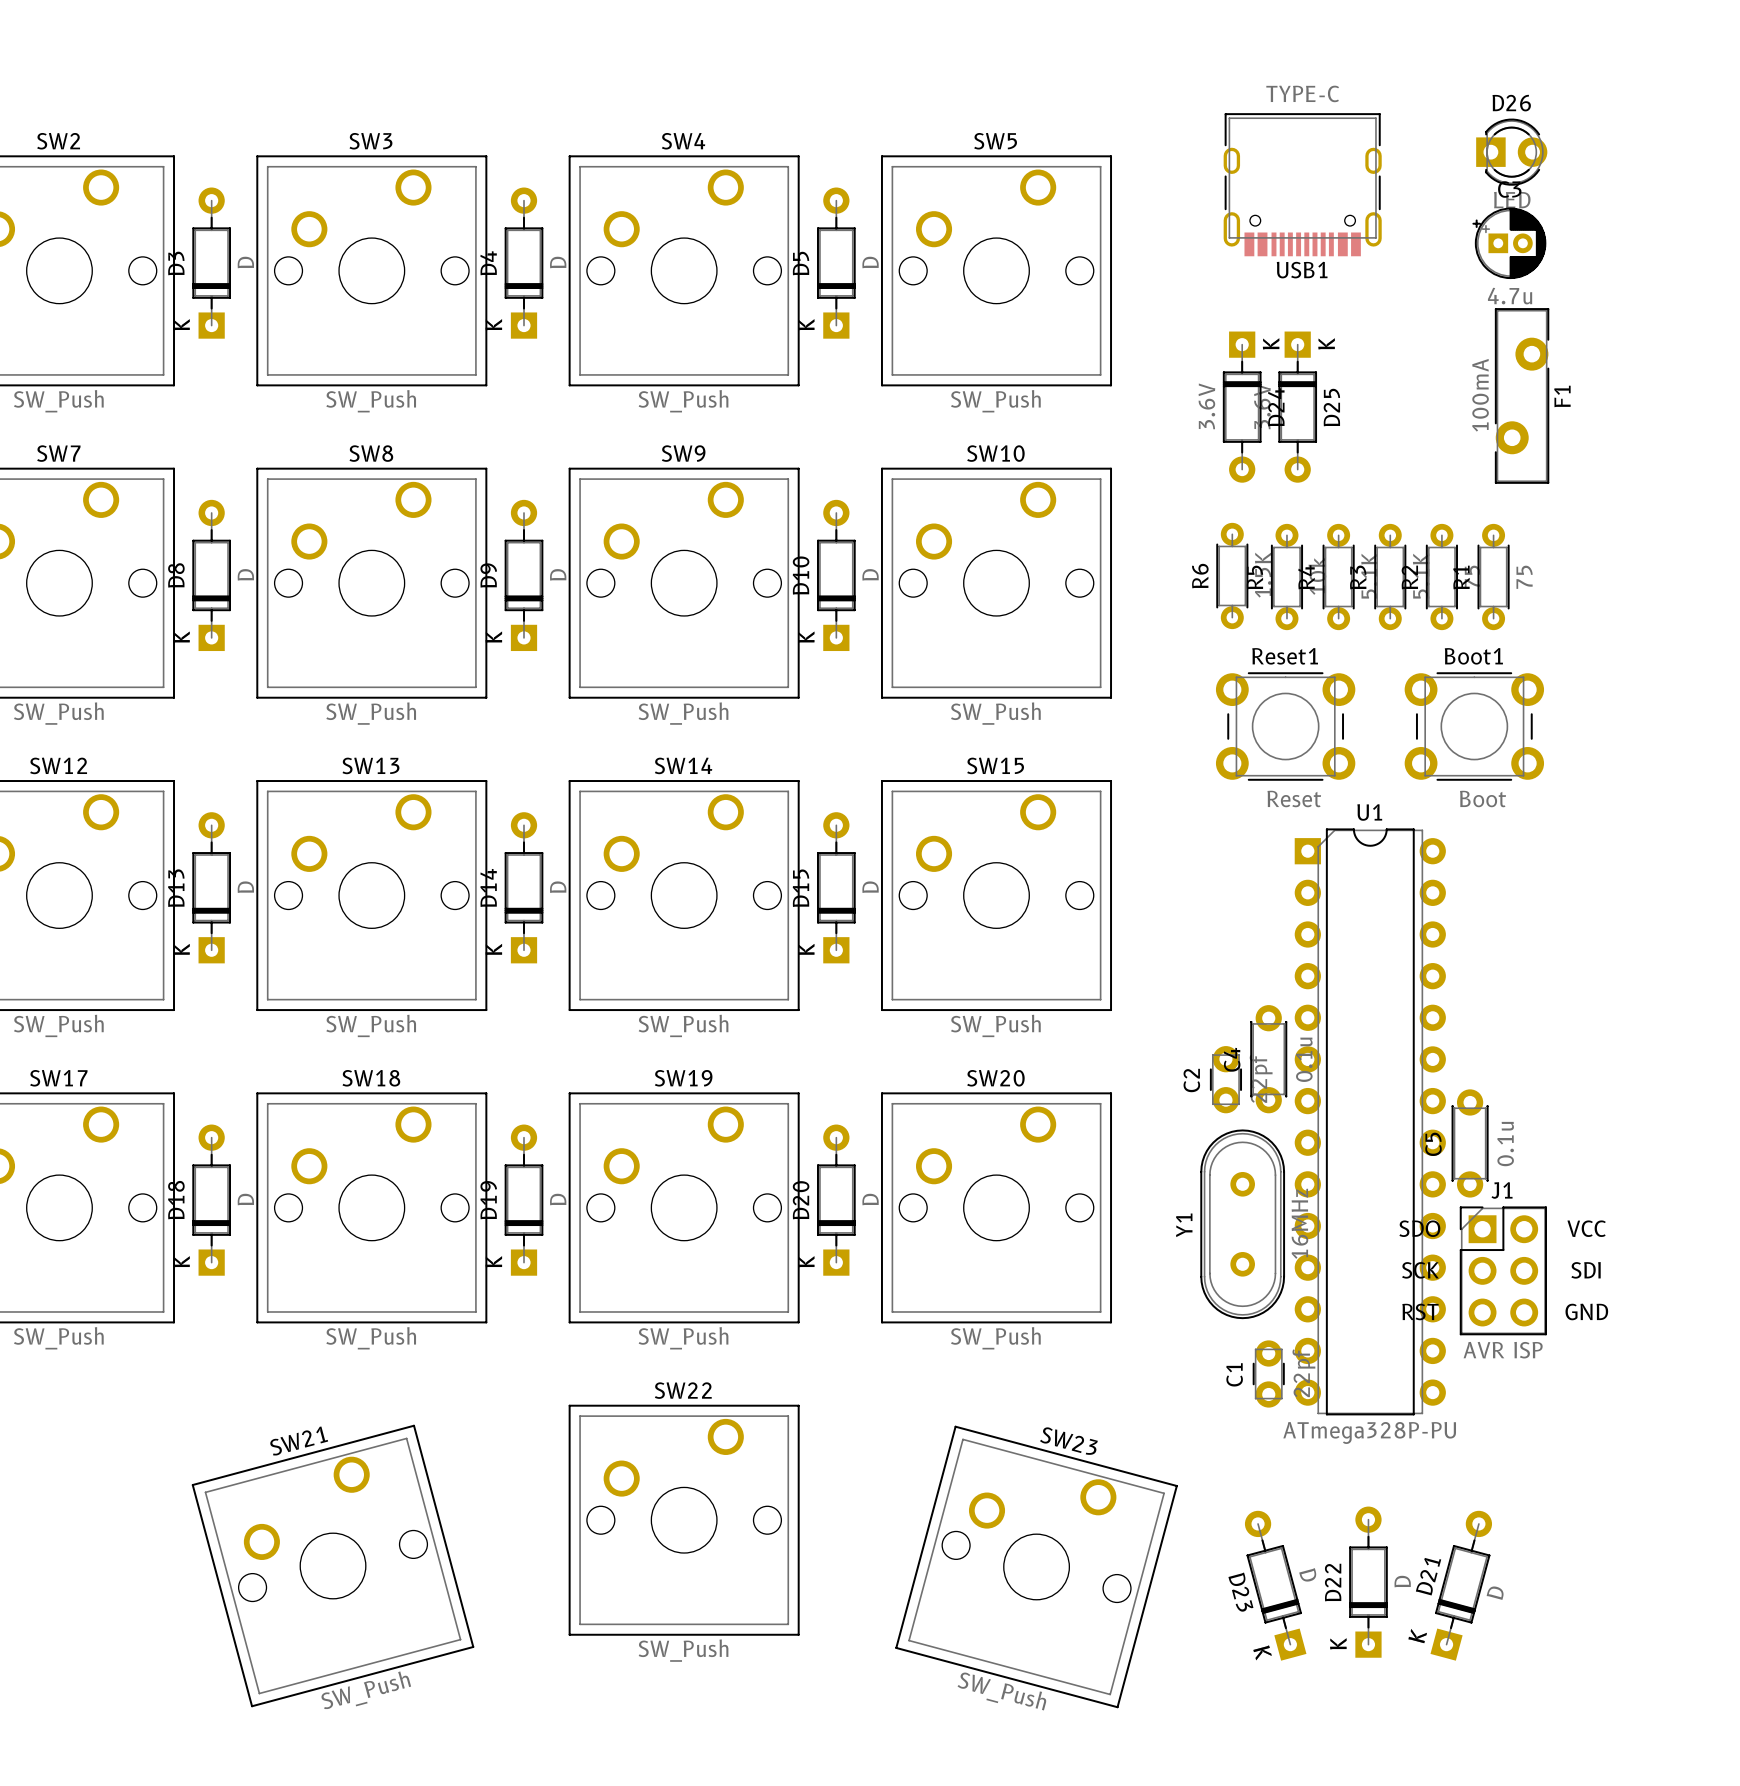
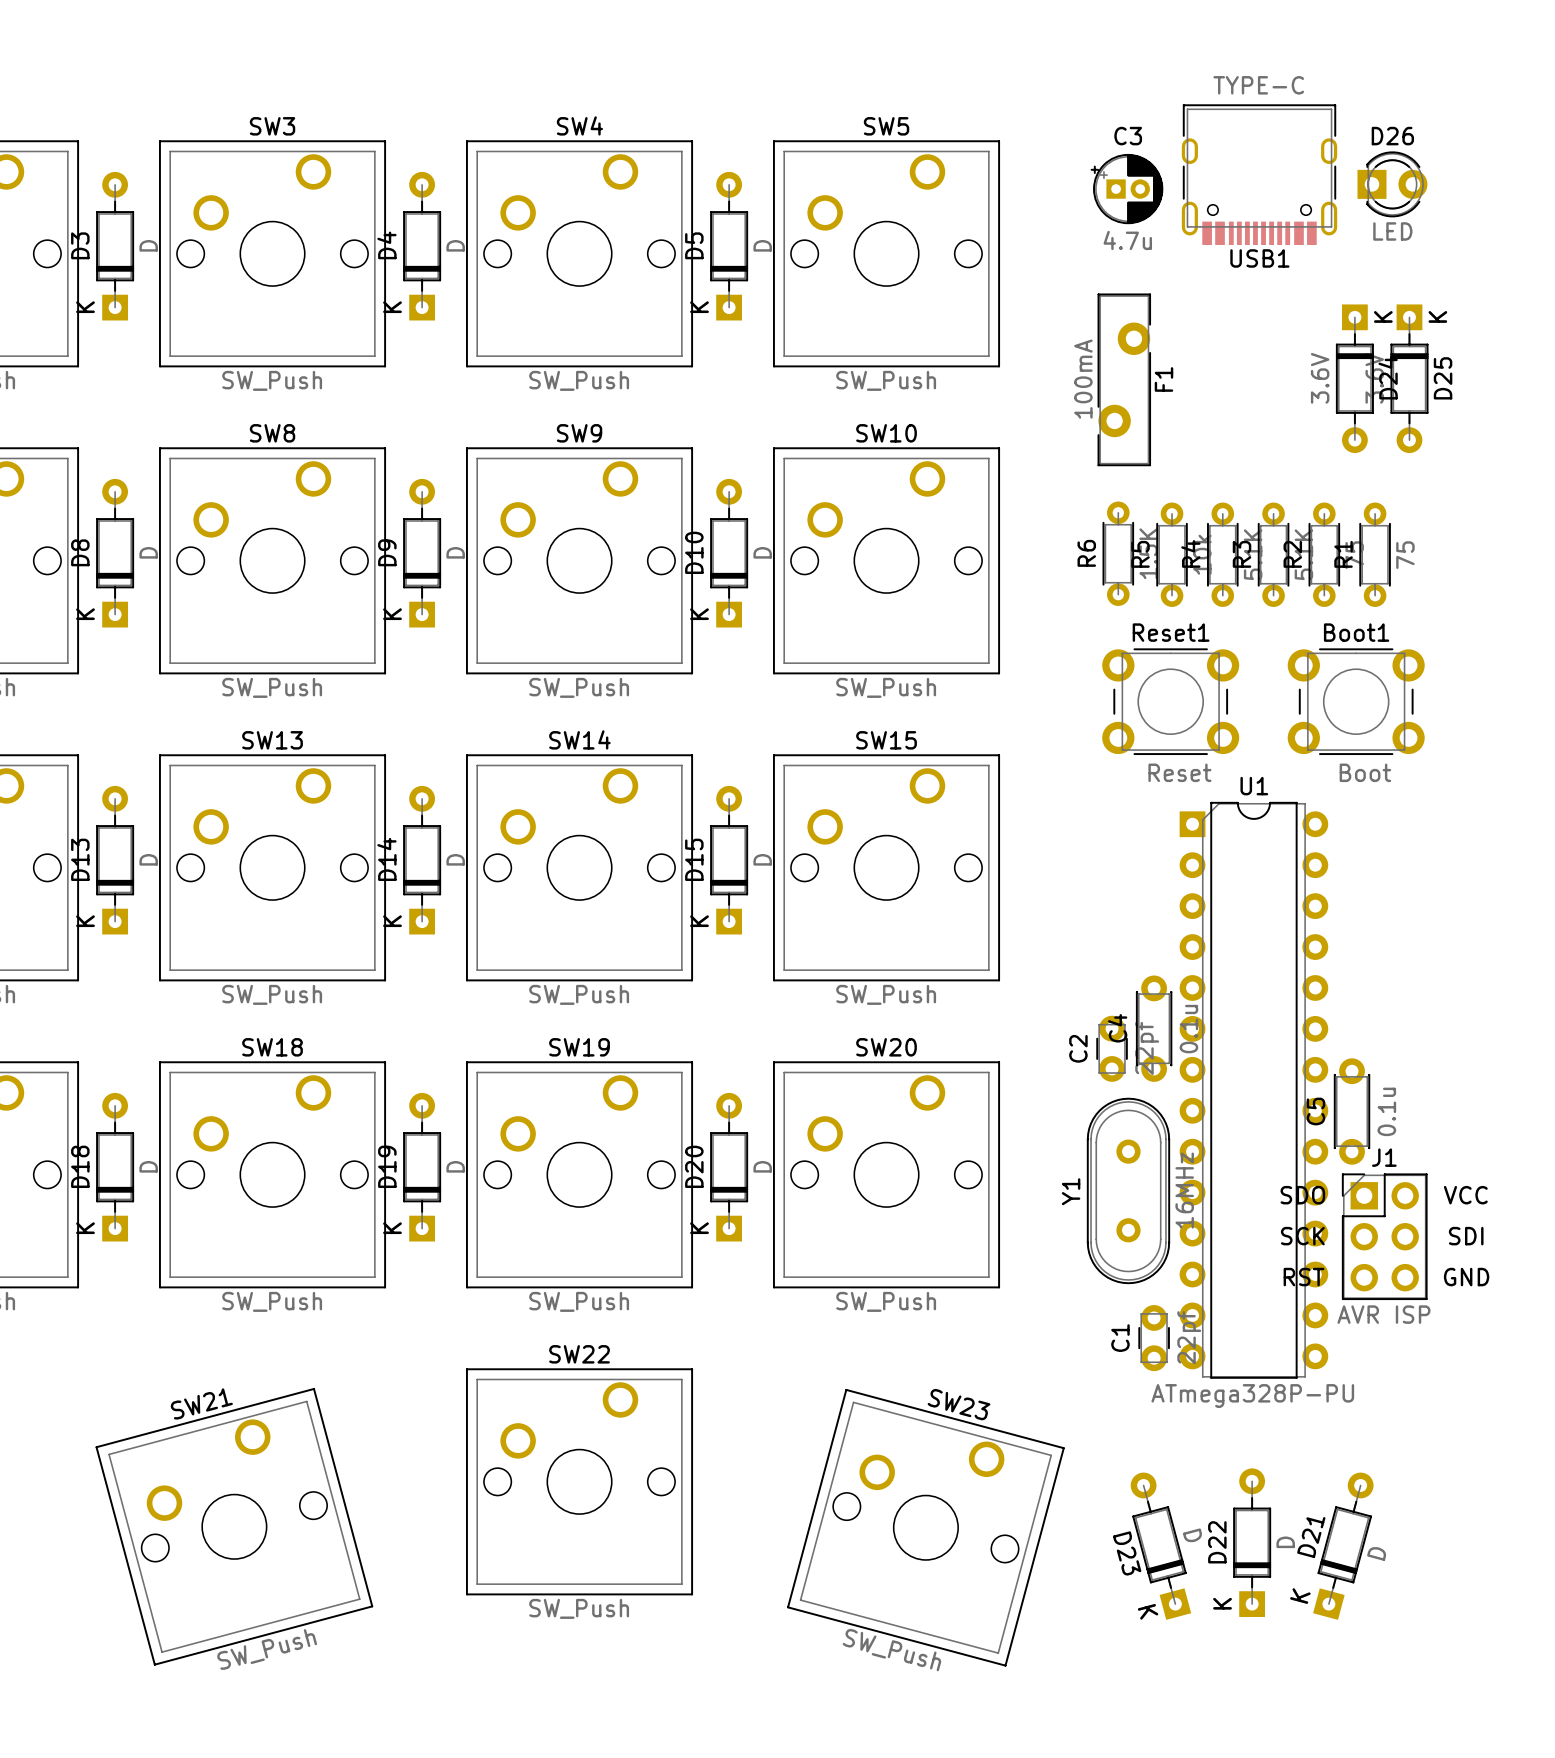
D26 position: (1511, 152) -> (1392, 184)
USB1 position: (1302, 184) -> (1259, 174)
C3 position: (1509, 243) -> (1126, 189)
F1 position: (1522, 395) -> (1124, 379)
D24 position: (1242, 407) -> (1354, 378)
D25 position: (1297, 407) -> (1409, 378)

